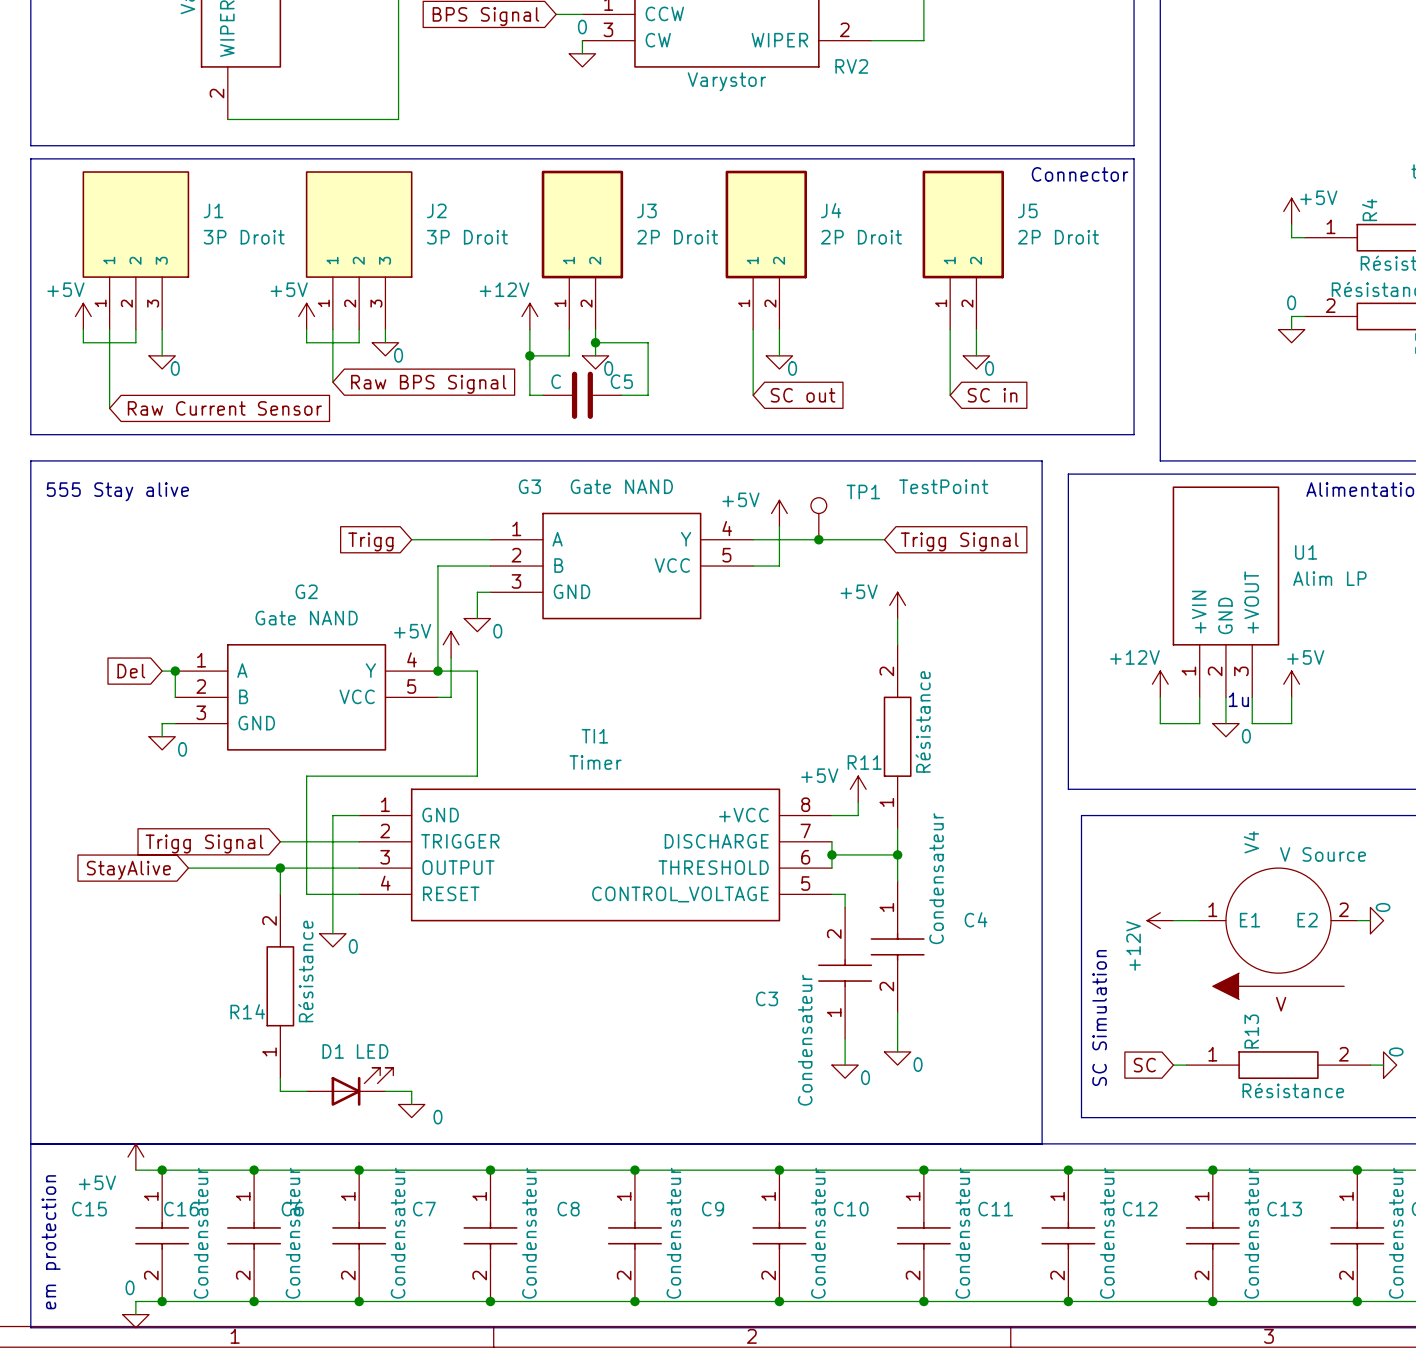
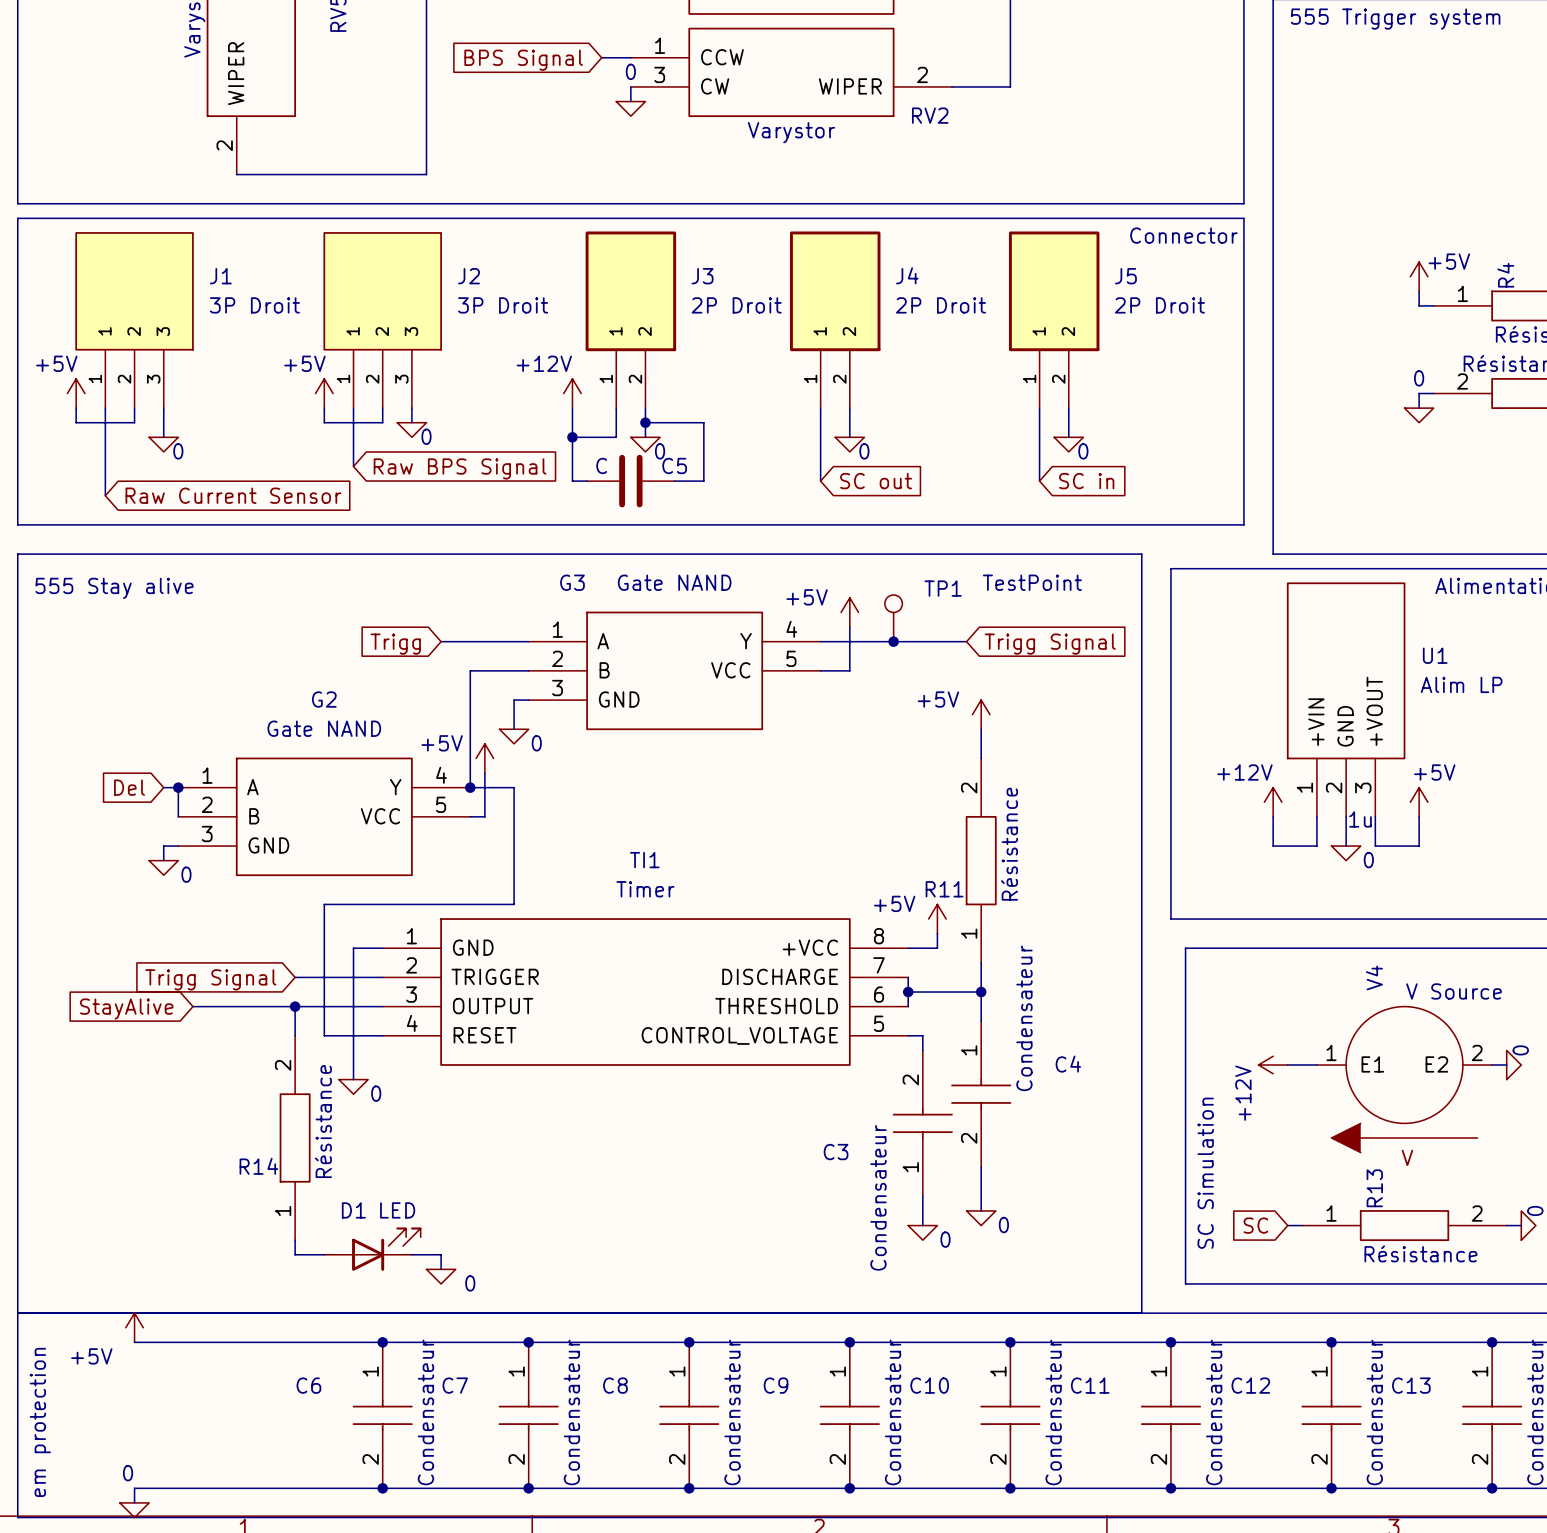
junction: (162, 1170) -> none
junction: (254, 1170) -> none
C15: (162, 1235) -> none
C16: (254, 1235) -> none
junction: (162, 1301) -> none
junction: (254, 1301) -> none

